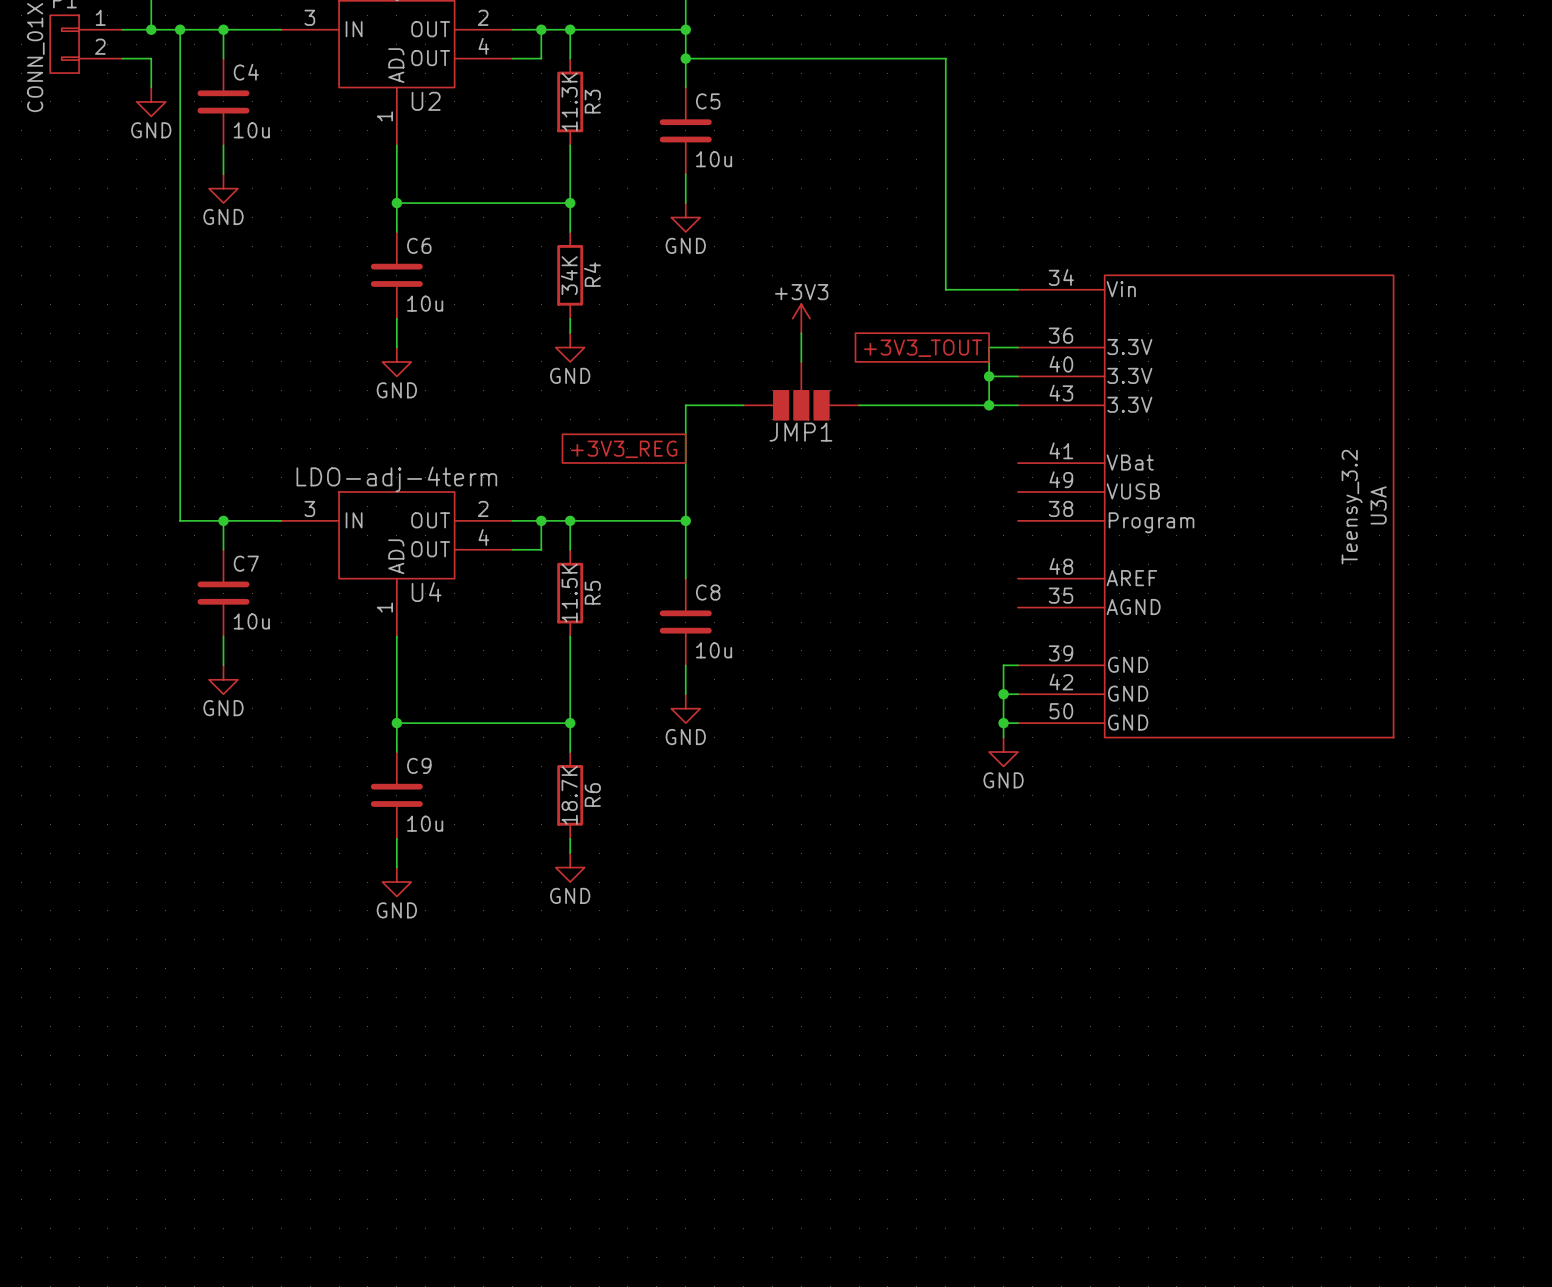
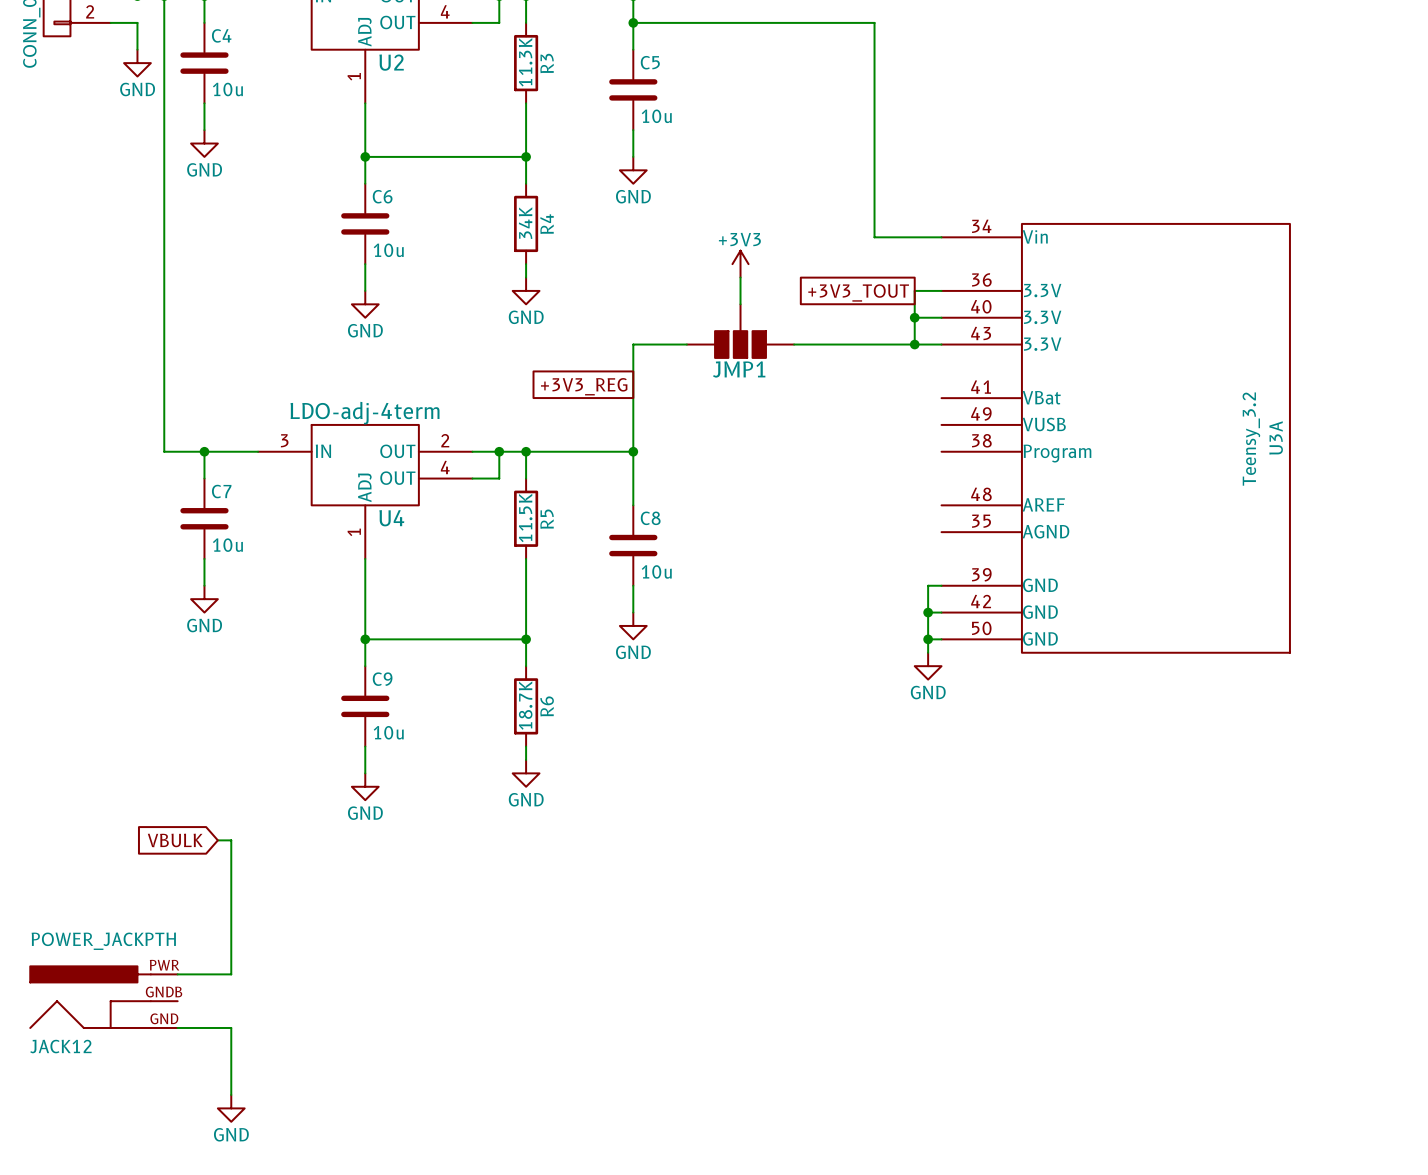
global label: none -> VBULK (175, 840)
wire: none -> (217, 840) (231, 840) (231, 974) (177, 974)
JACK12: none -> POWER_JACKPTH (103, 997)
wire: none -> (177, 1027) (231, 1027) (231, 1095)
power symbol: none -> GND (231, 1108)

